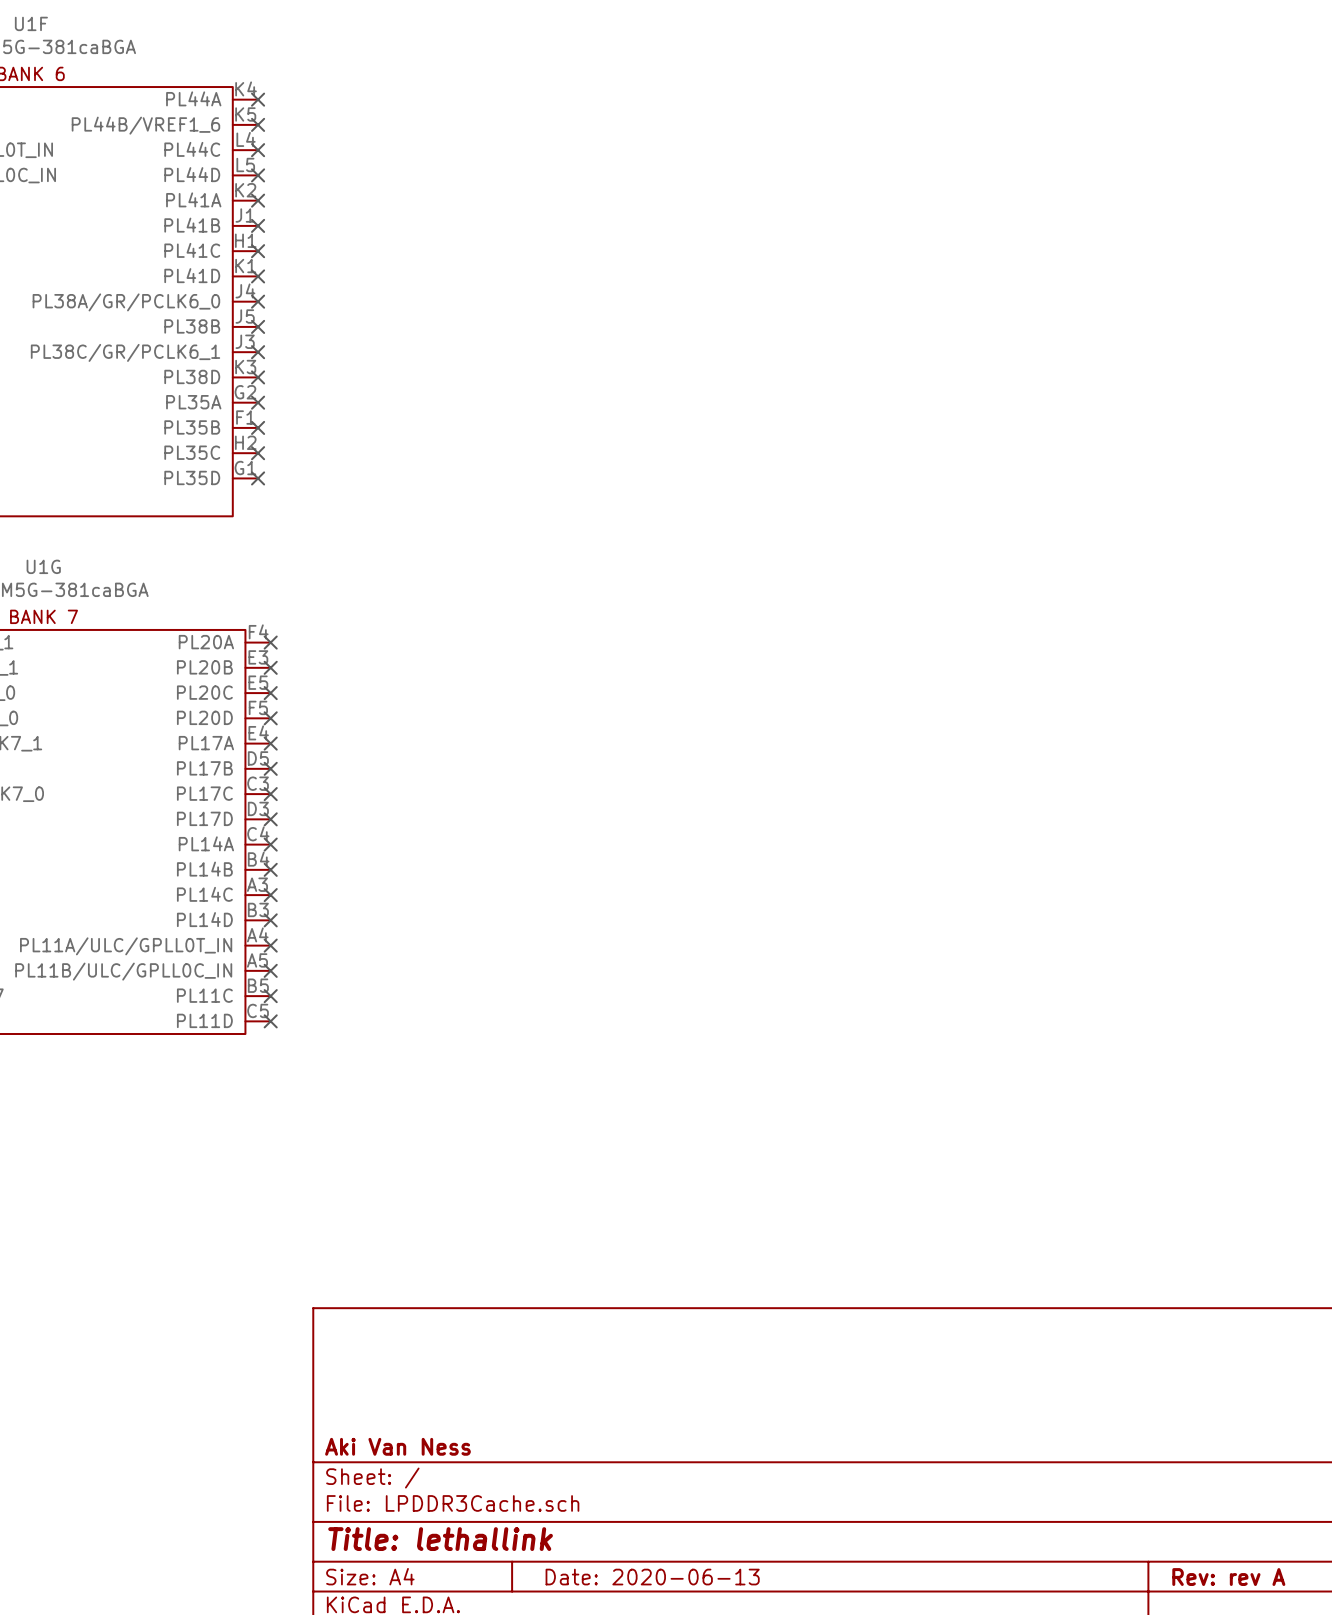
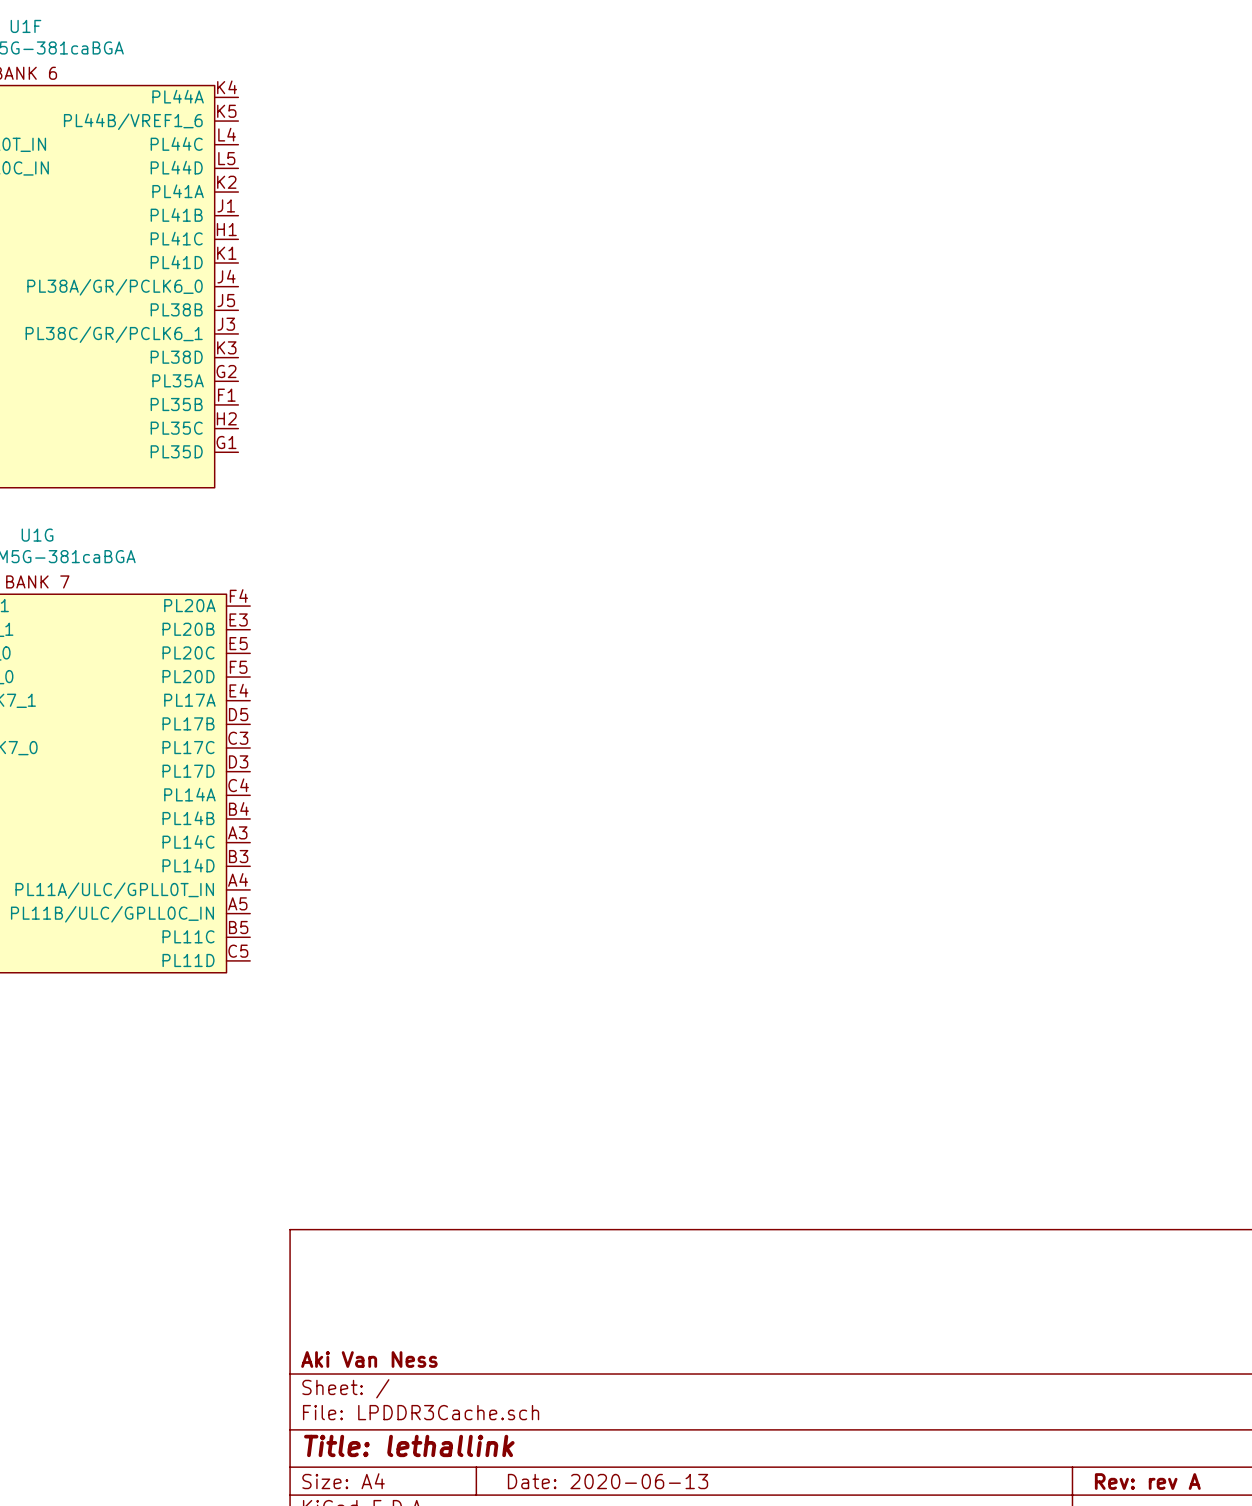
no-connect mark: (258, 99) -> none
no-connect mark: (258, 124) -> none
no-connect mark: (258, 150) -> none
no-connect mark: (258, 175) -> none
no-connect mark: (258, 200) -> none
no-connect mark: (258, 225) -> none
no-connect mark: (258, 251) -> none
no-connect mark: (258, 276) -> none
no-connect mark: (258, 301) -> none
no-connect mark: (258, 326) -> none
no-connect mark: (258, 352) -> none
no-connect mark: (258, 377) -> none
no-connect mark: (258, 402) -> none
no-connect mark: (258, 427) -> none
no-connect mark: (258, 453) -> none
no-connect mark: (258, 478) -> none
no-connect mark: (270, 642) -> none
no-connect mark: (270, 667) -> none
no-connect mark: (270, 693) -> none
no-connect mark: (270, 718) -> none
no-connect mark: (270, 743) -> none
no-connect mark: (270, 768) -> none
no-connect mark: (270, 794) -> none
no-connect mark: (270, 819) -> none
no-connect mark: (270, 844) -> none
no-connect mark: (270, 869) -> none
no-connect mark: (270, 895) -> none
no-connect mark: (270, 920) -> none
no-connect mark: (270, 945) -> none
no-connect mark: (270, 970) -> none
no-connect mark: (270, 996) -> none
no-connect mark: (270, 1021) -> none

